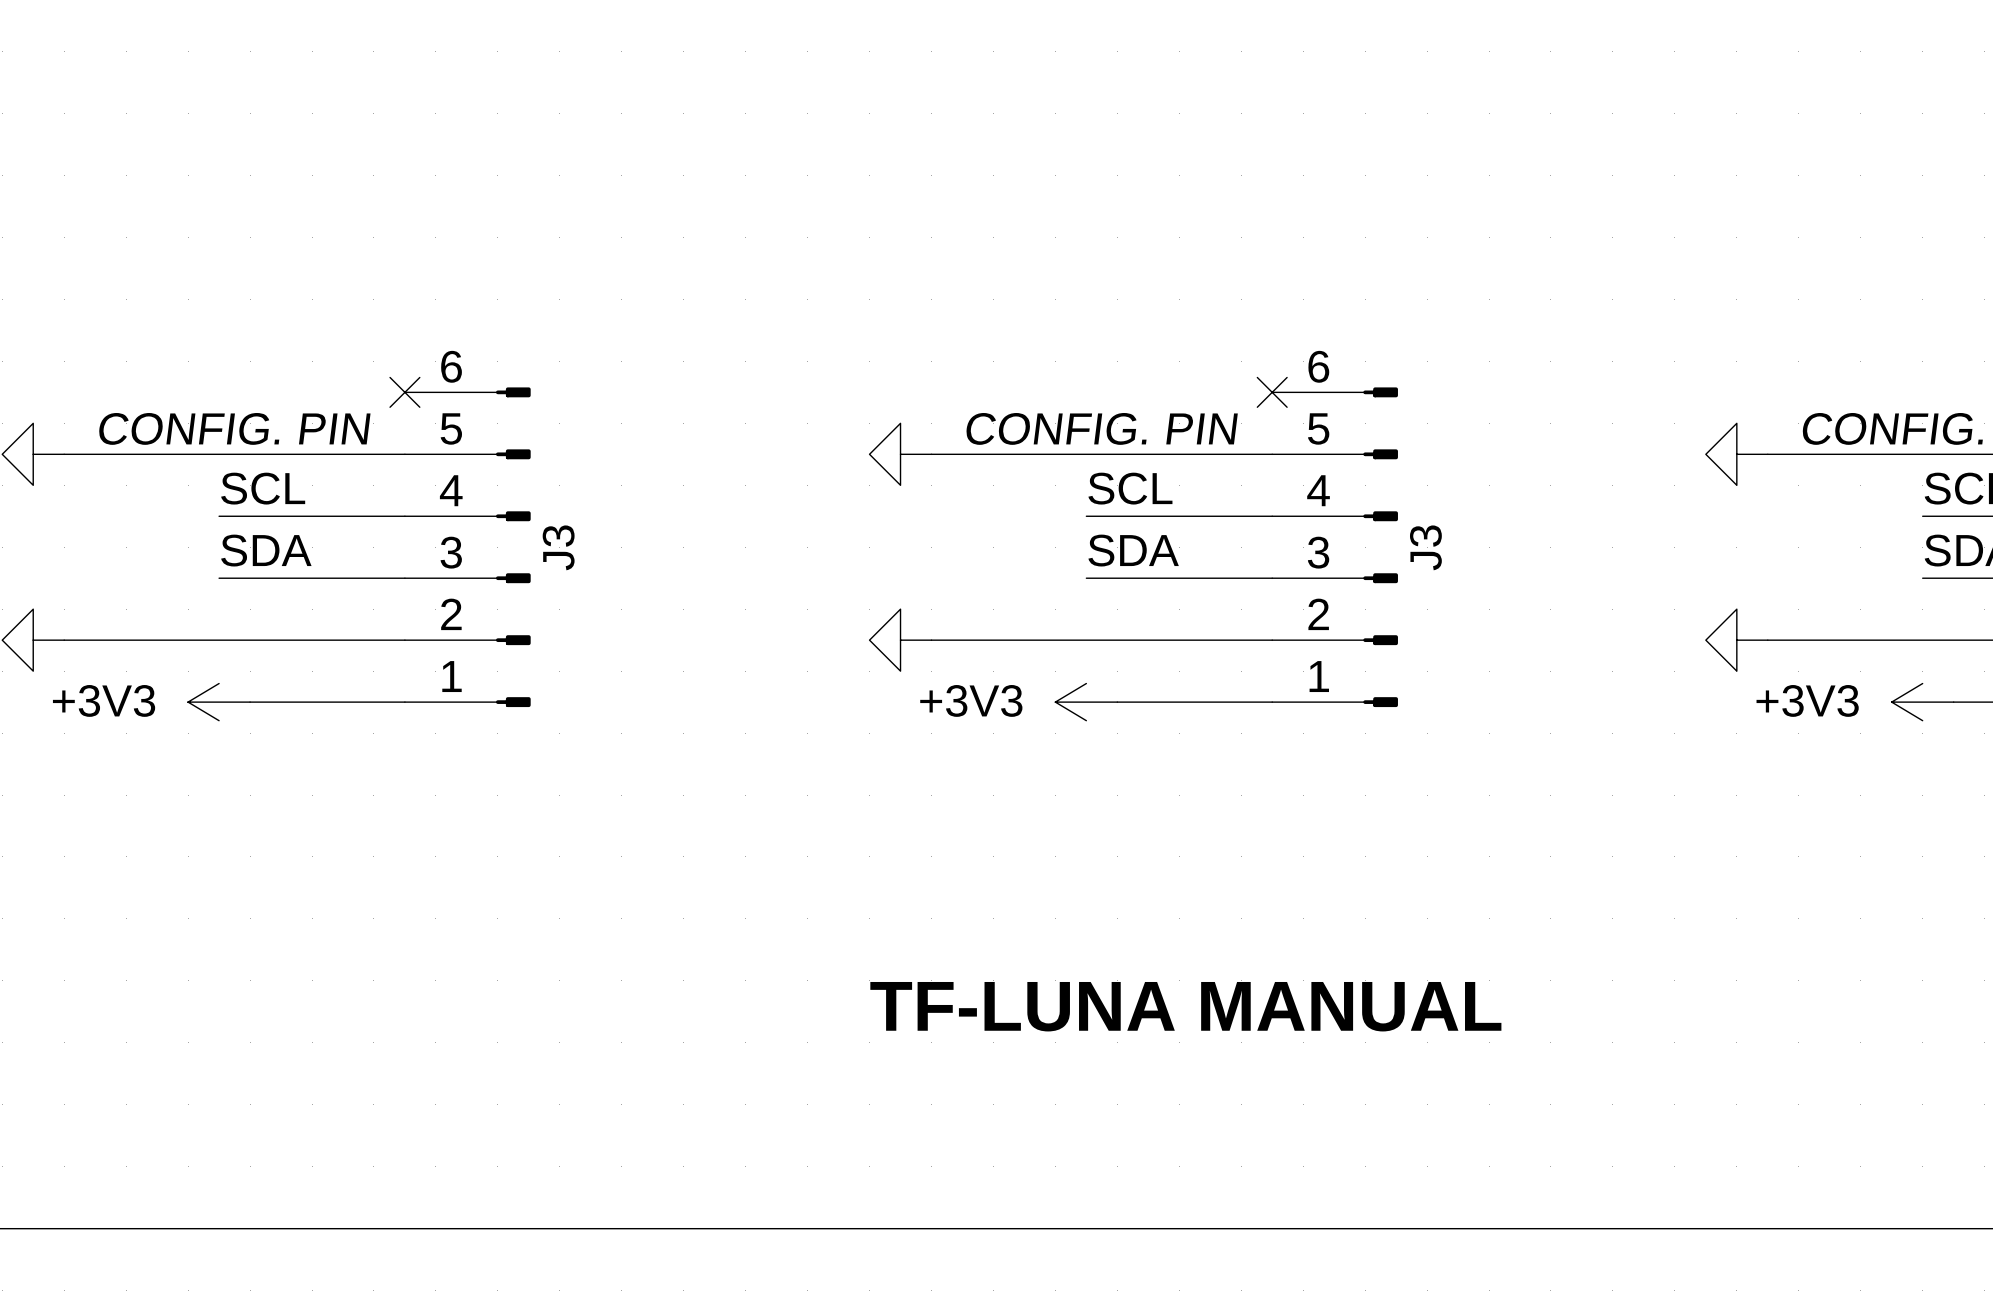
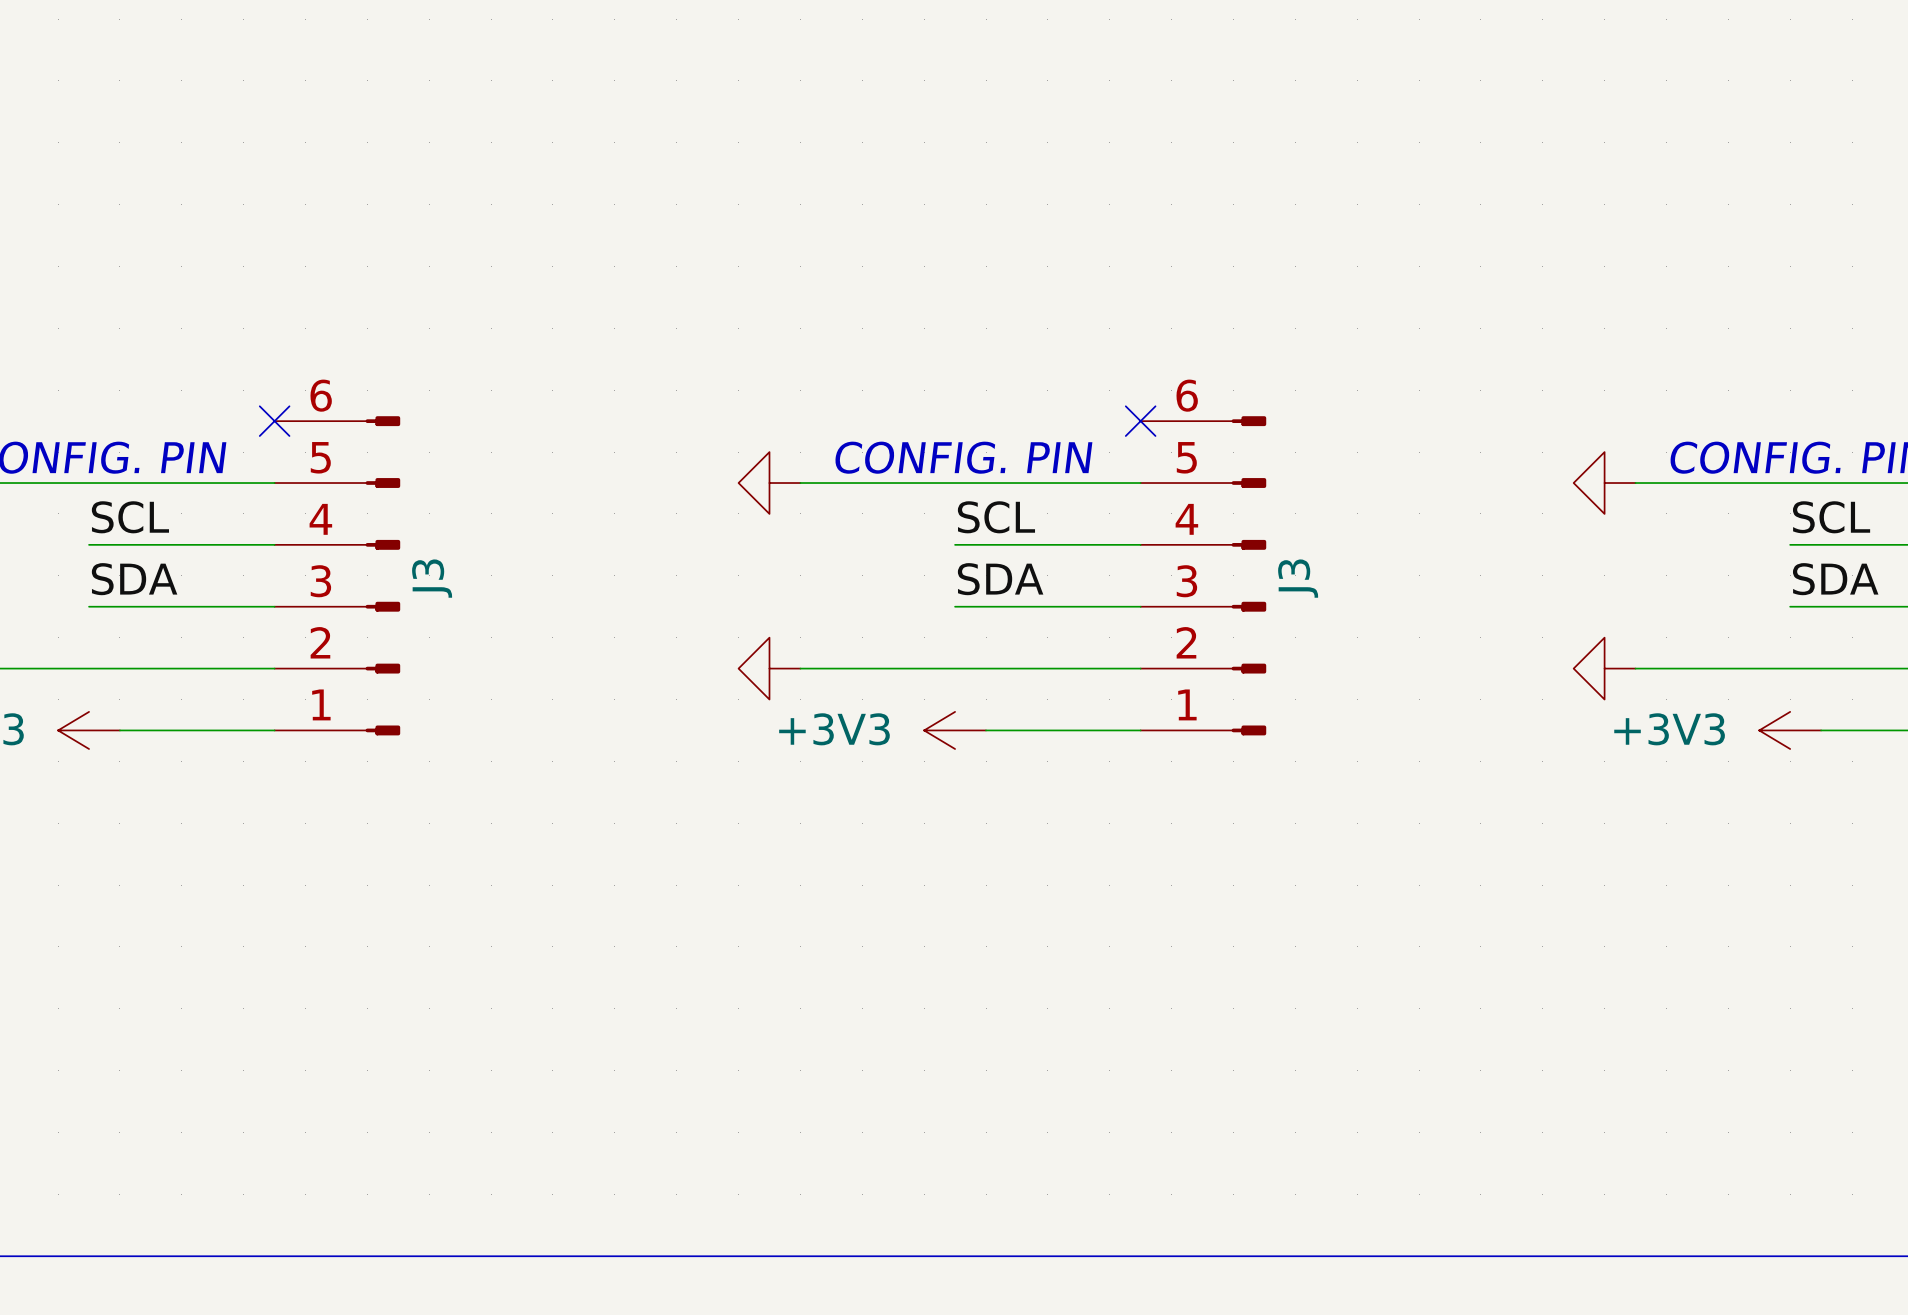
text: TF-LUNA MANUAL (1185, 1006) -> none

